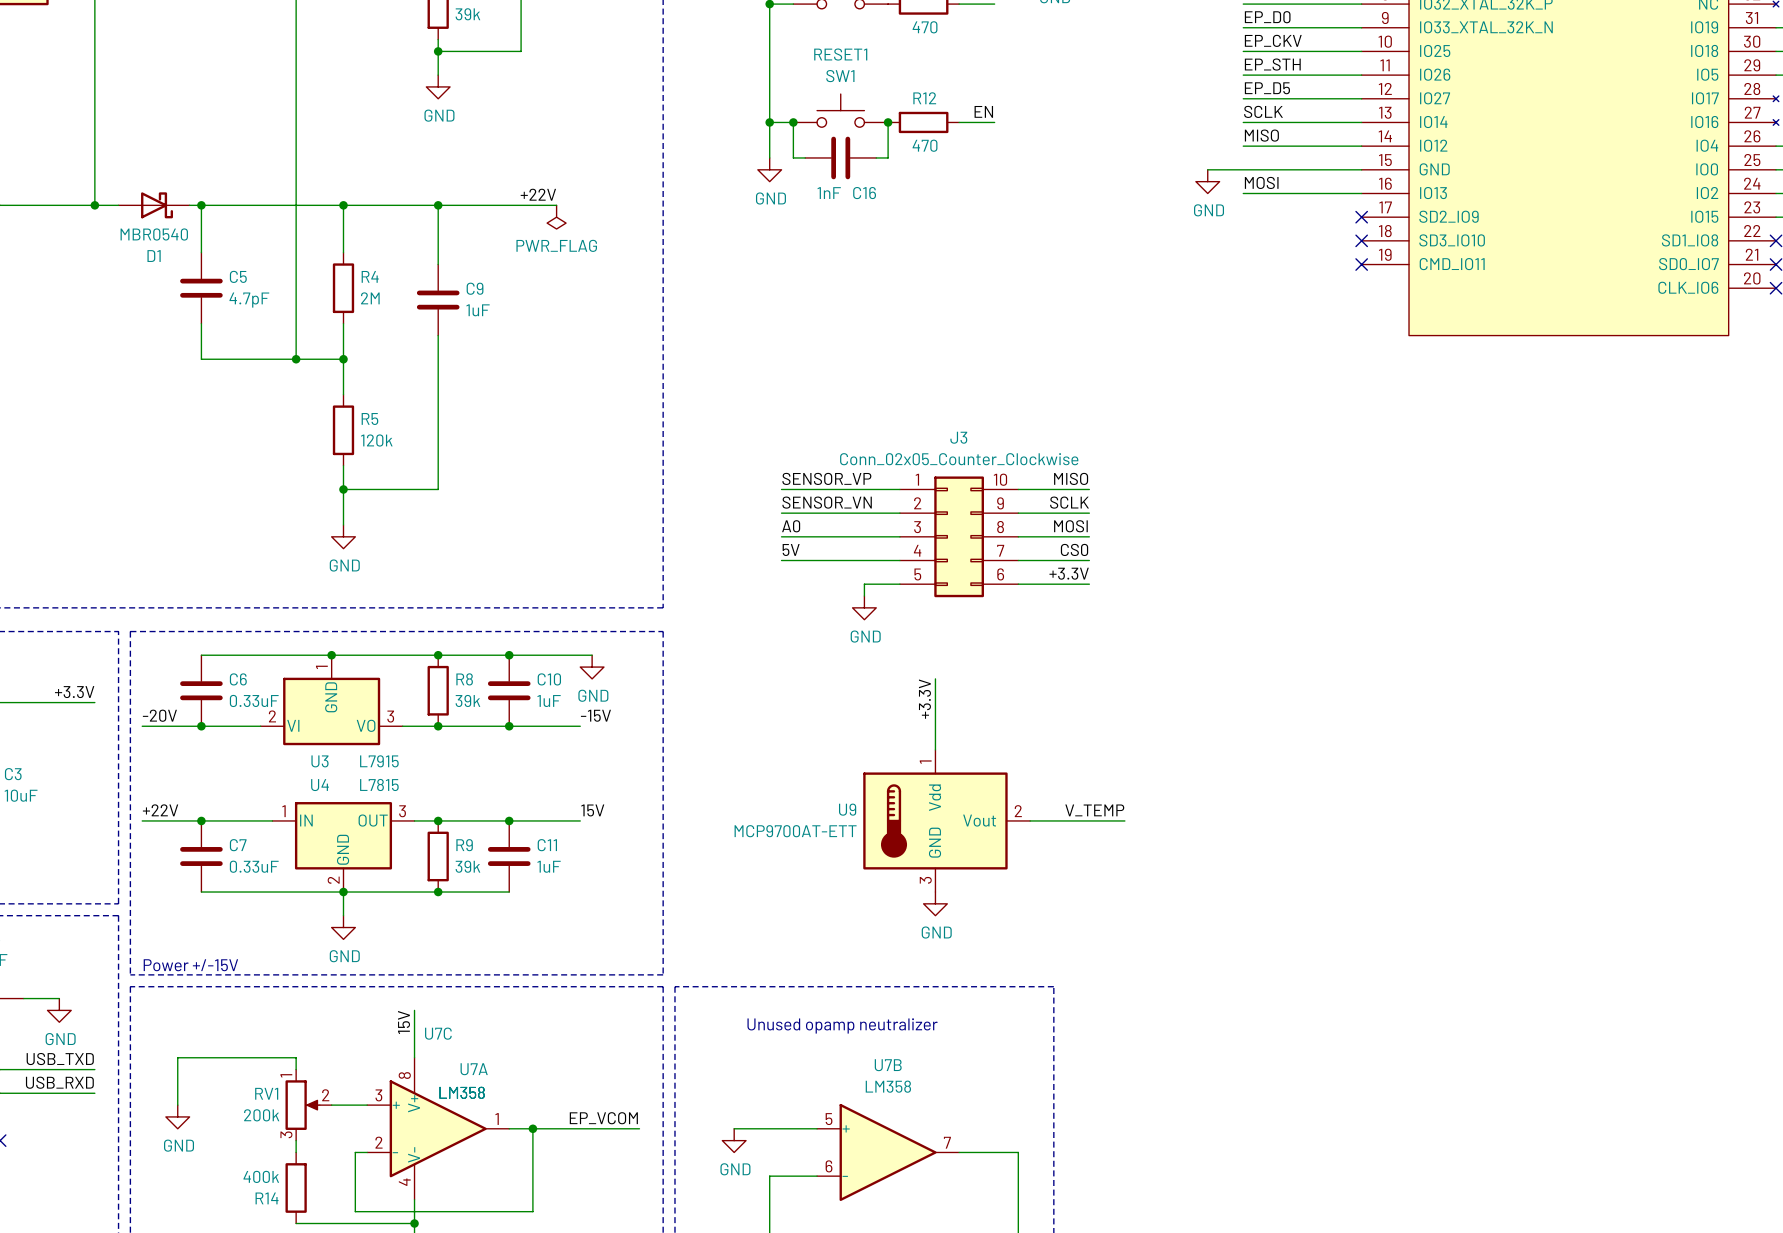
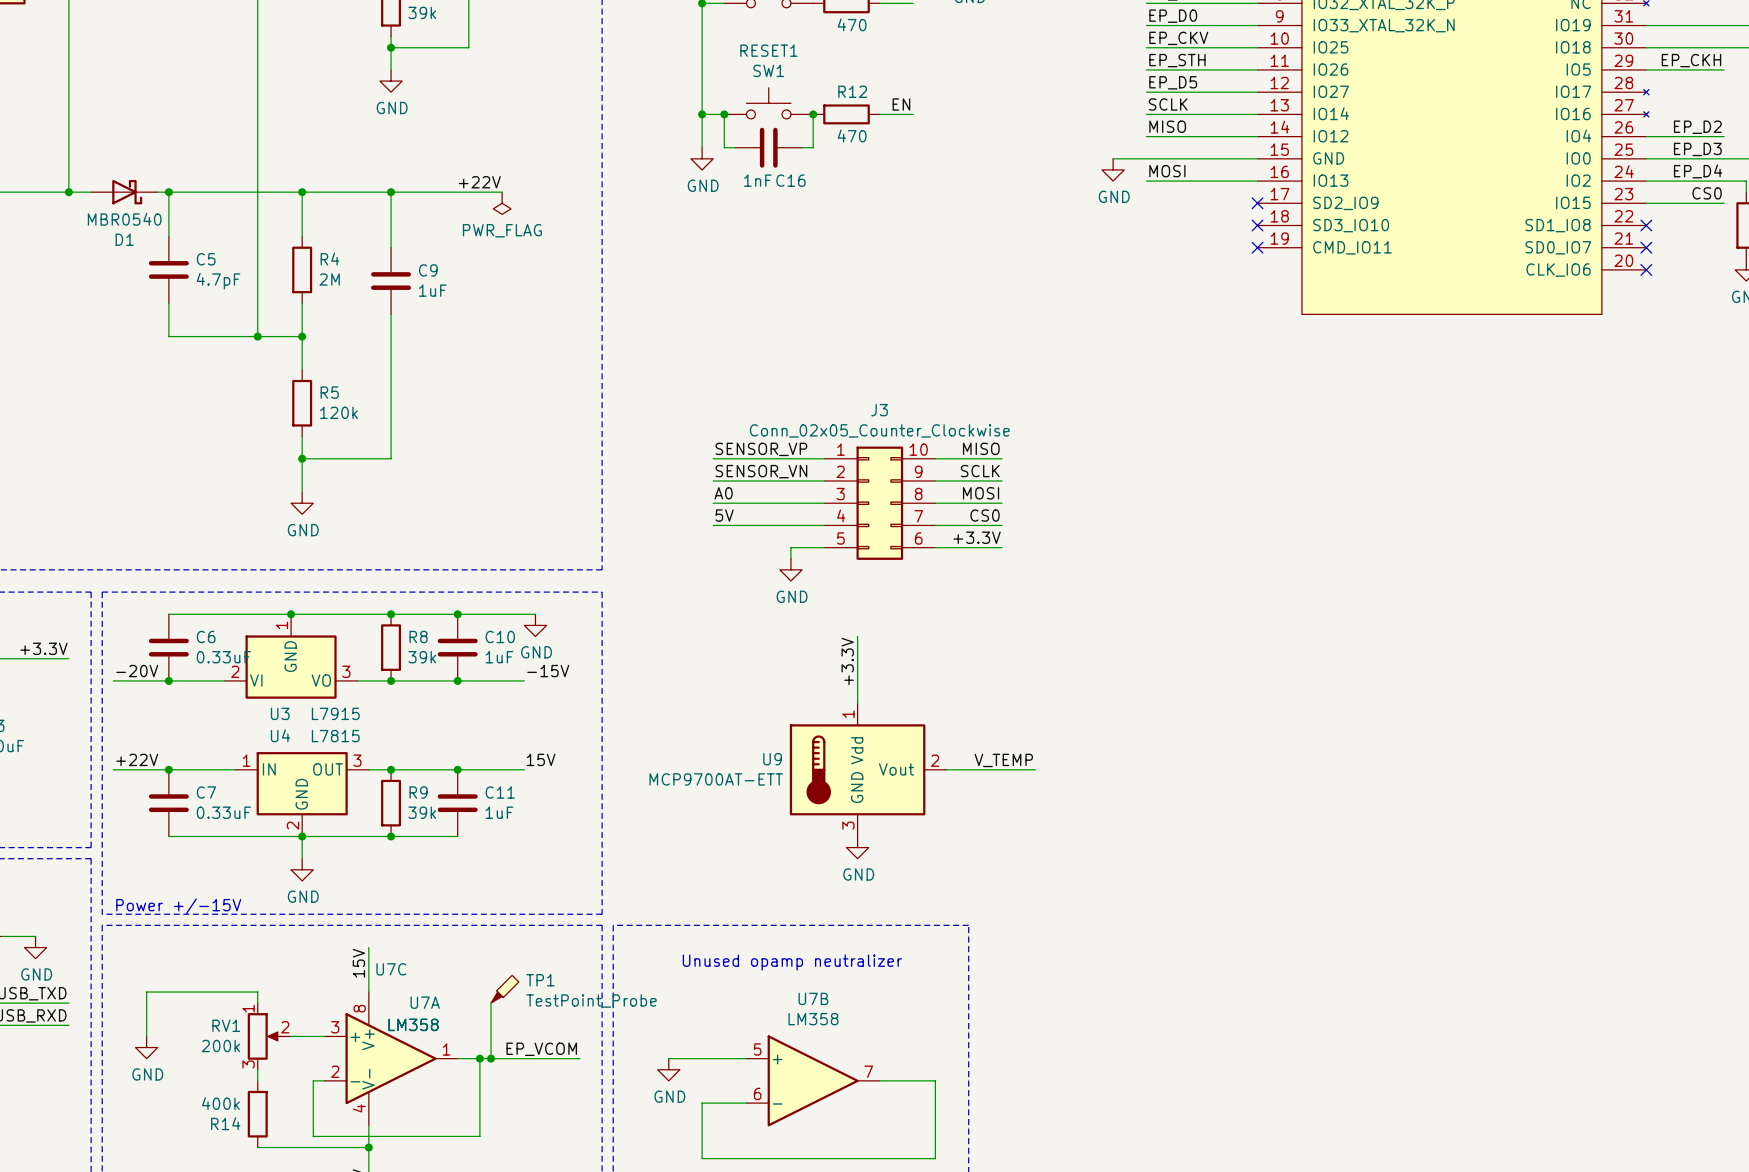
TP1: none -> TestPoint_Probe (504, 989)
wire: none -> (491, 1003) (491, 1058)
junction: none -> (491, 1058)

